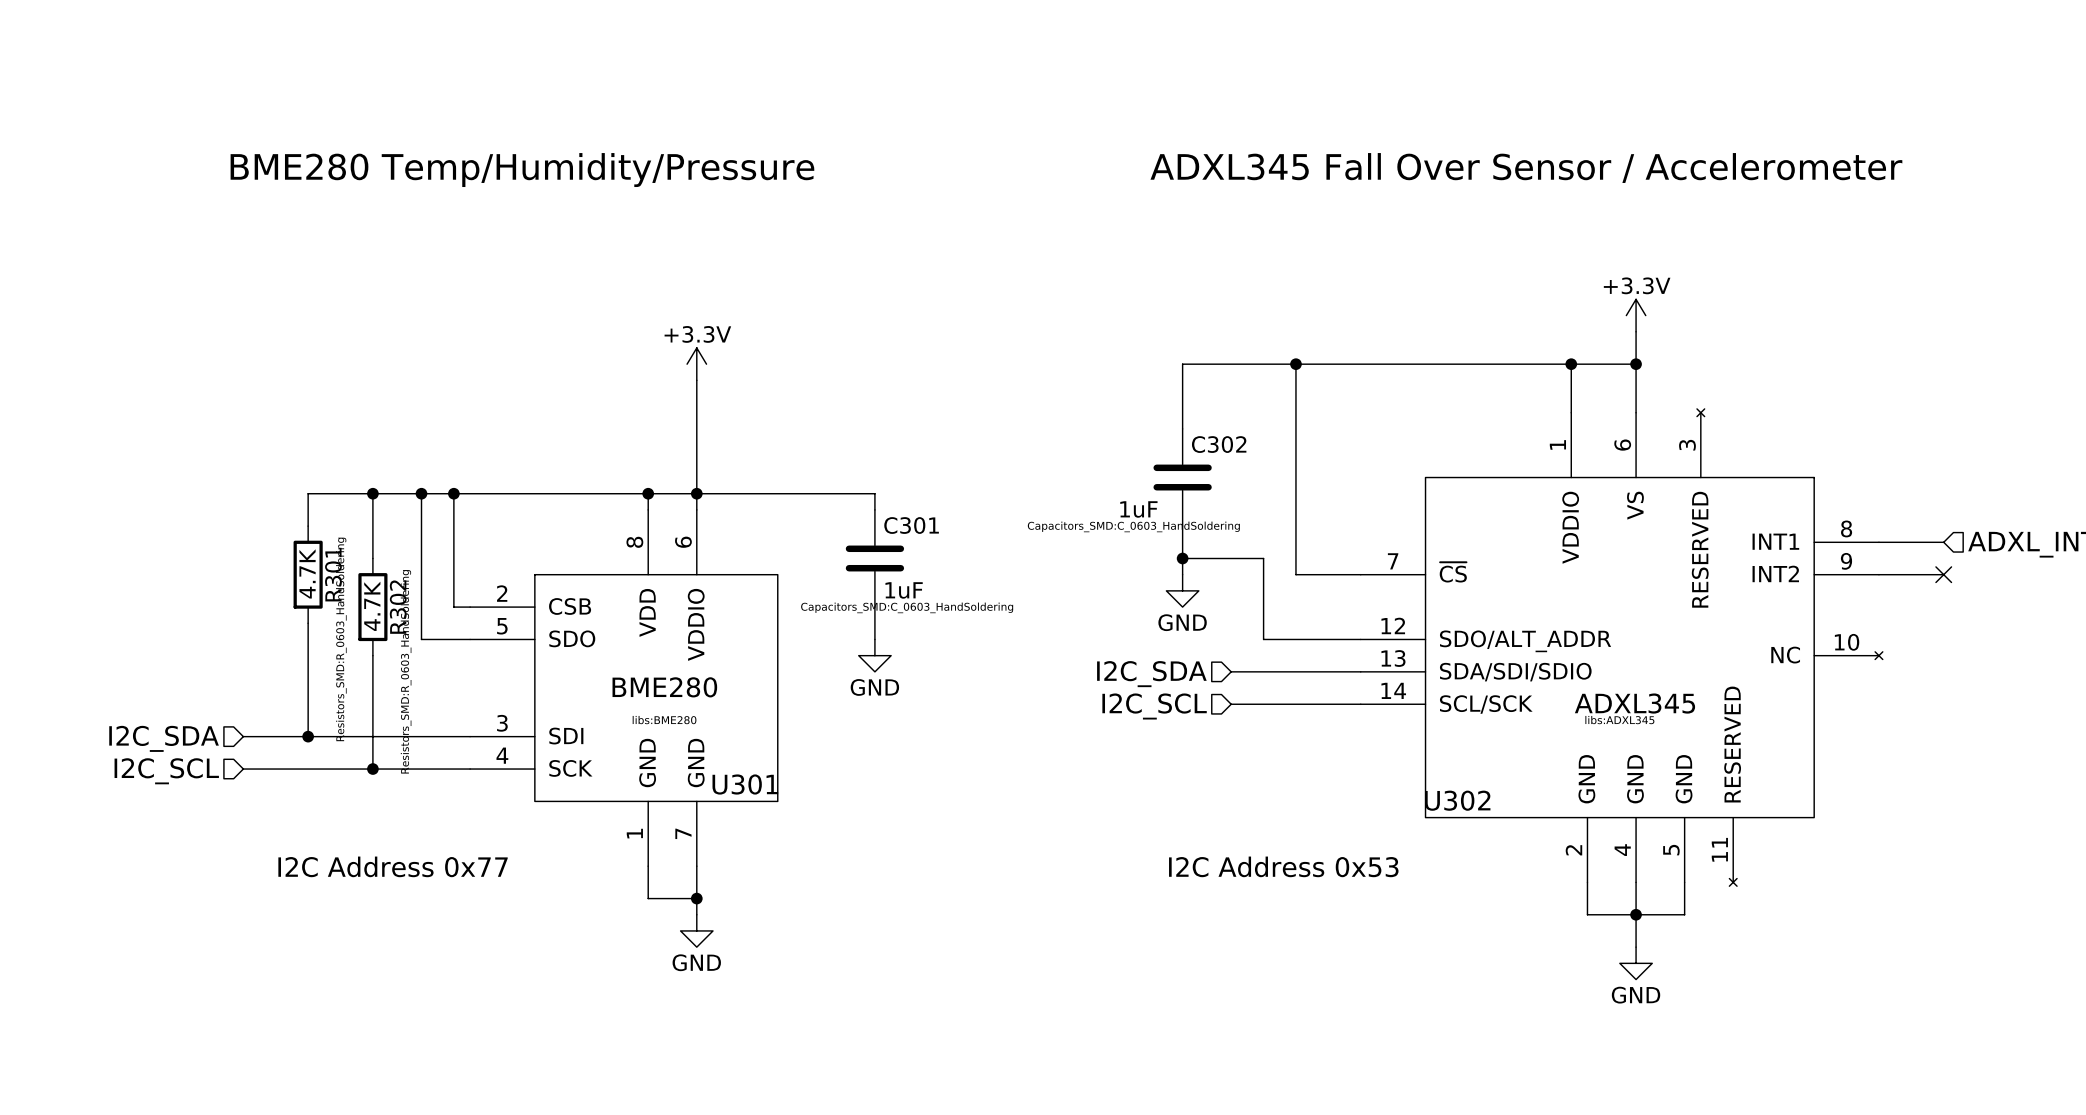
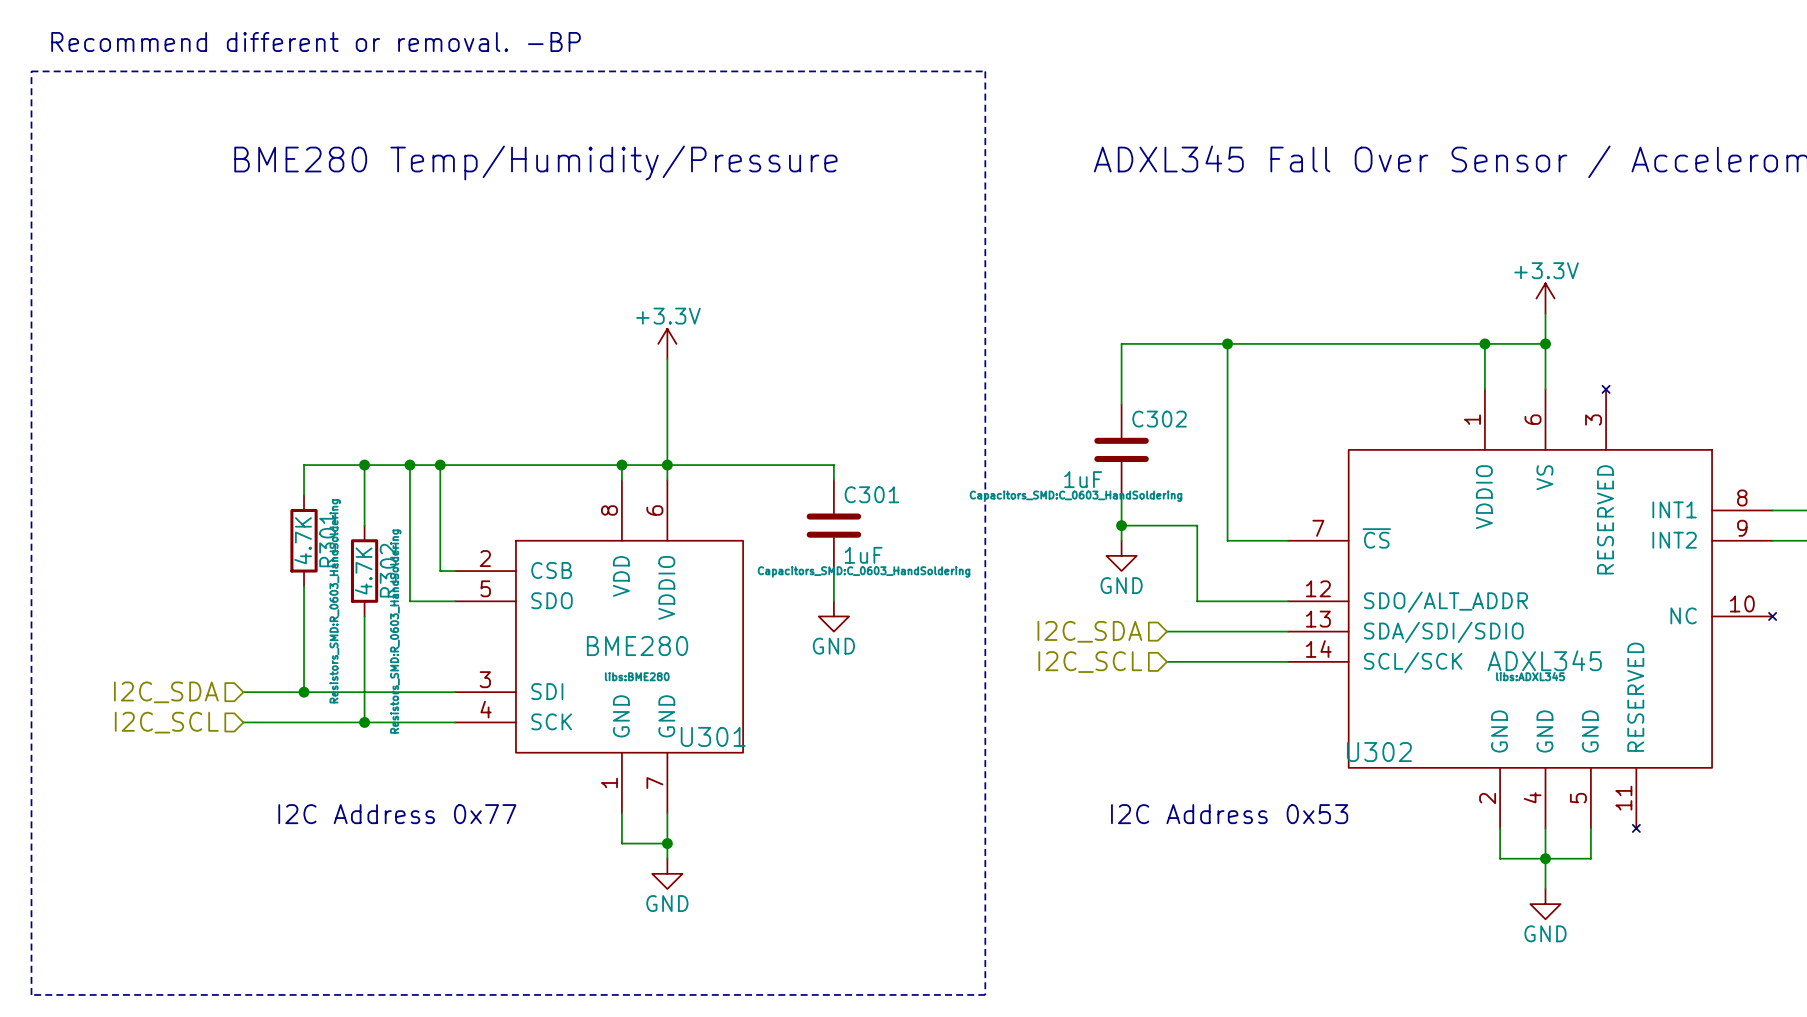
text: none -> Recommend different or removal. -BP (316, 41)
line: none -> (31, 71) (985, 71) (985, 994) (31, 994) (31, 71)

